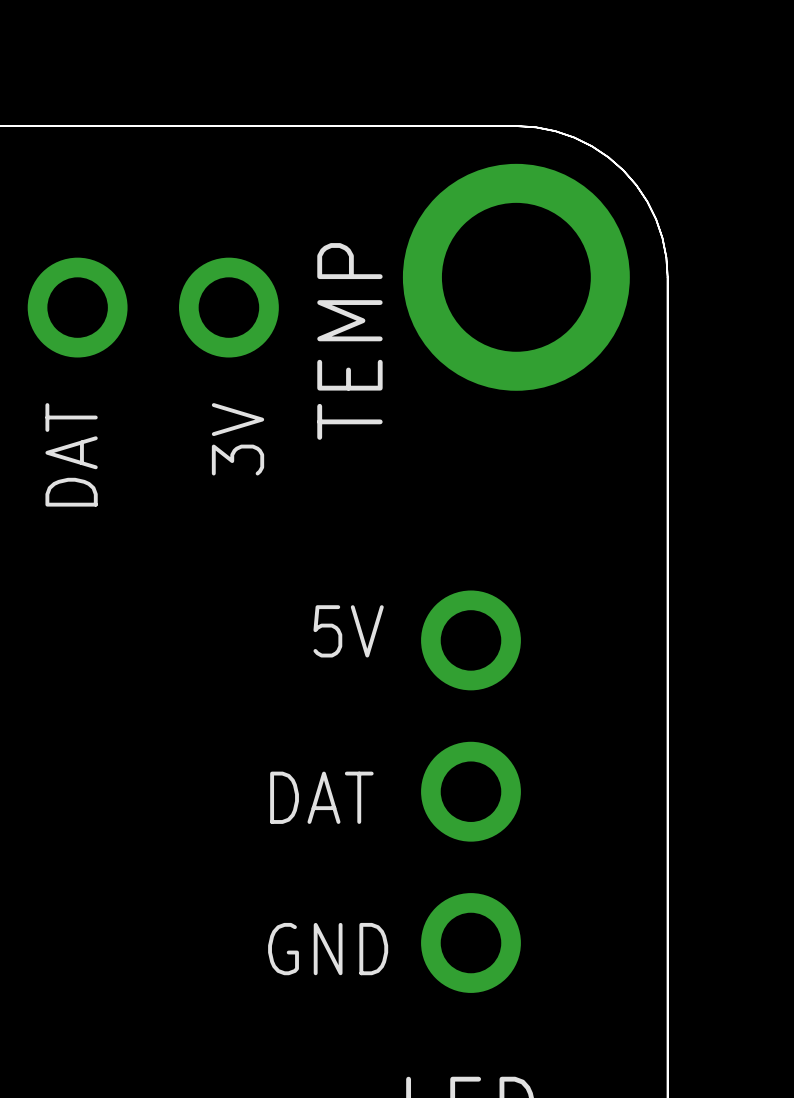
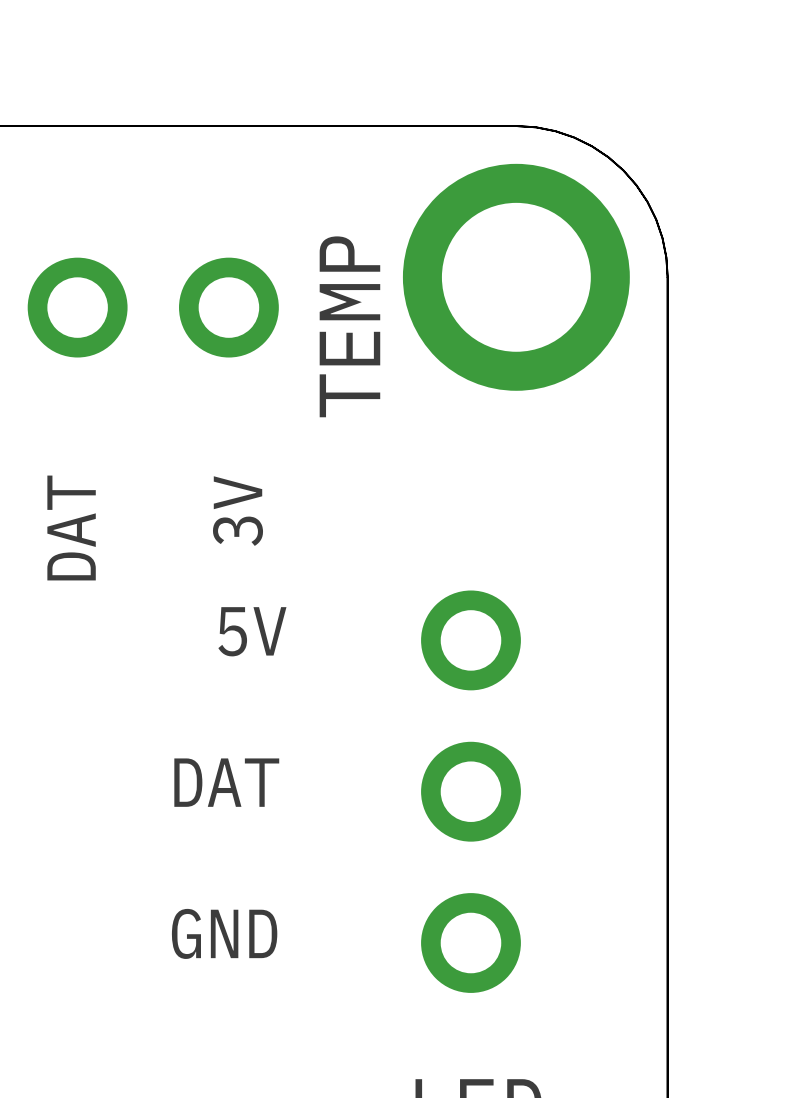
text position: 3V (238, 439) -> 3V (238, 511)
text position: DAT (71, 454) -> DAT (71, 528)
text position: 5V (348, 631) -> 5V (252, 631)
text position: DAT (321, 797) -> DAT (226, 782)
text position: GND (328, 949) -> GND (224, 933)

